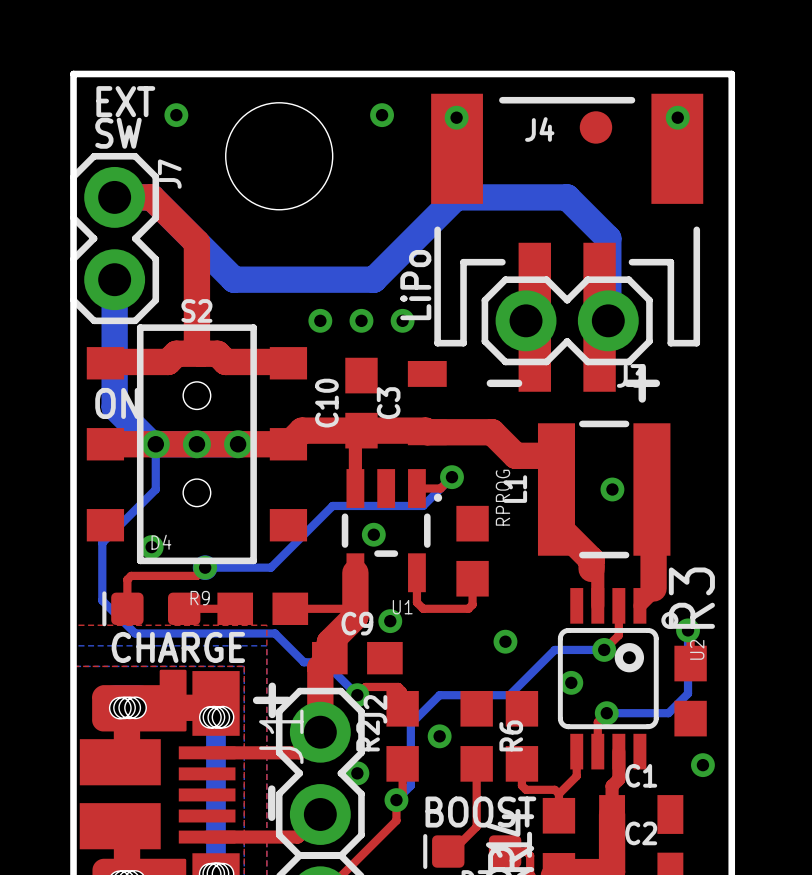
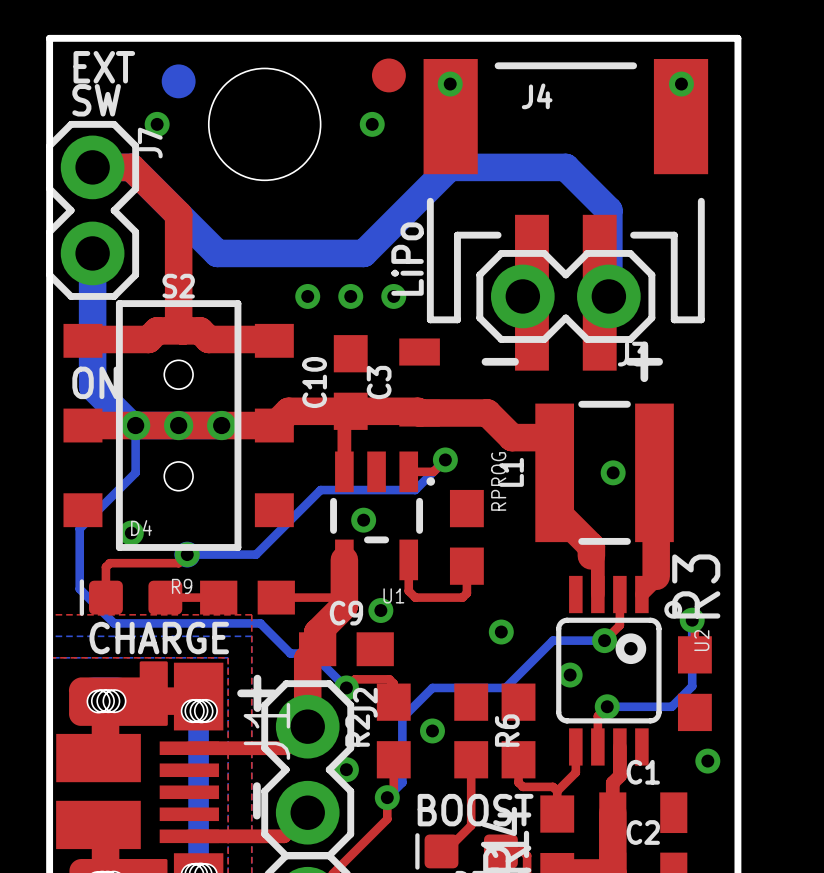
via position: (176, 115) -> (157, 124)
part: none -> (178, 81)
via position: (382, 115) -> (372, 124)
part position: (595, 127) -> (388, 75)

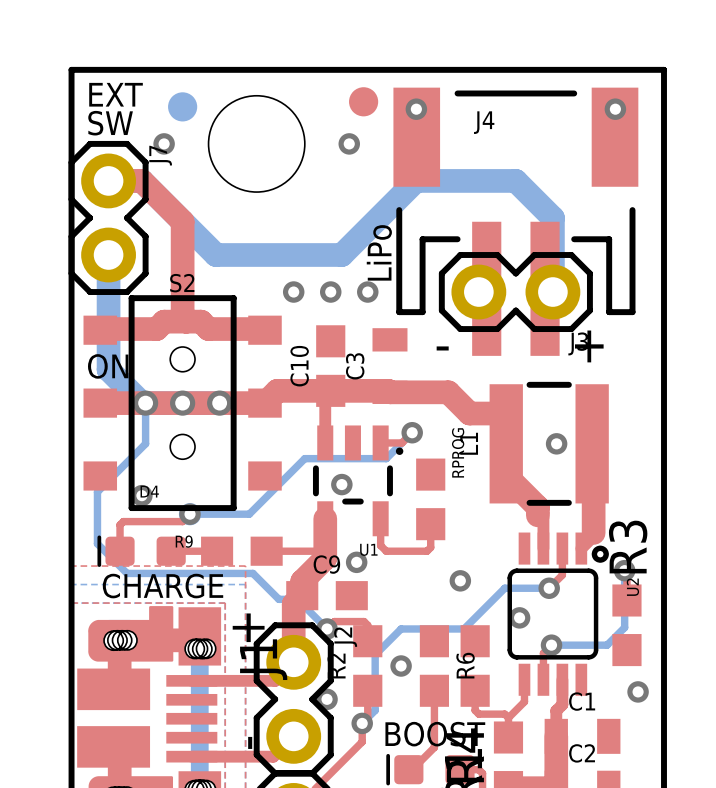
U2 footprint: [556, 575, 683, 766] -> [507, 532, 609, 696]

